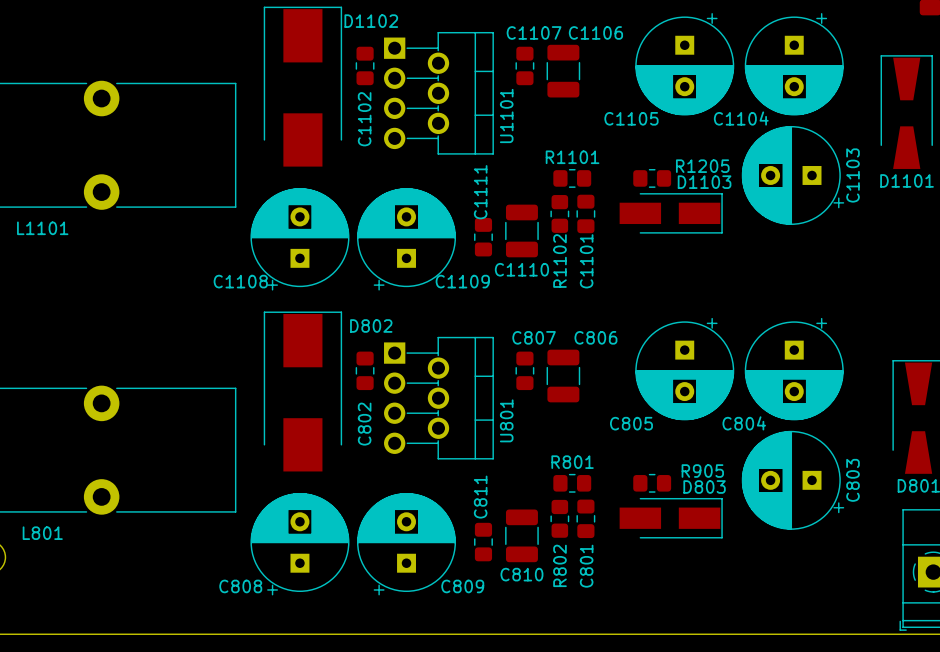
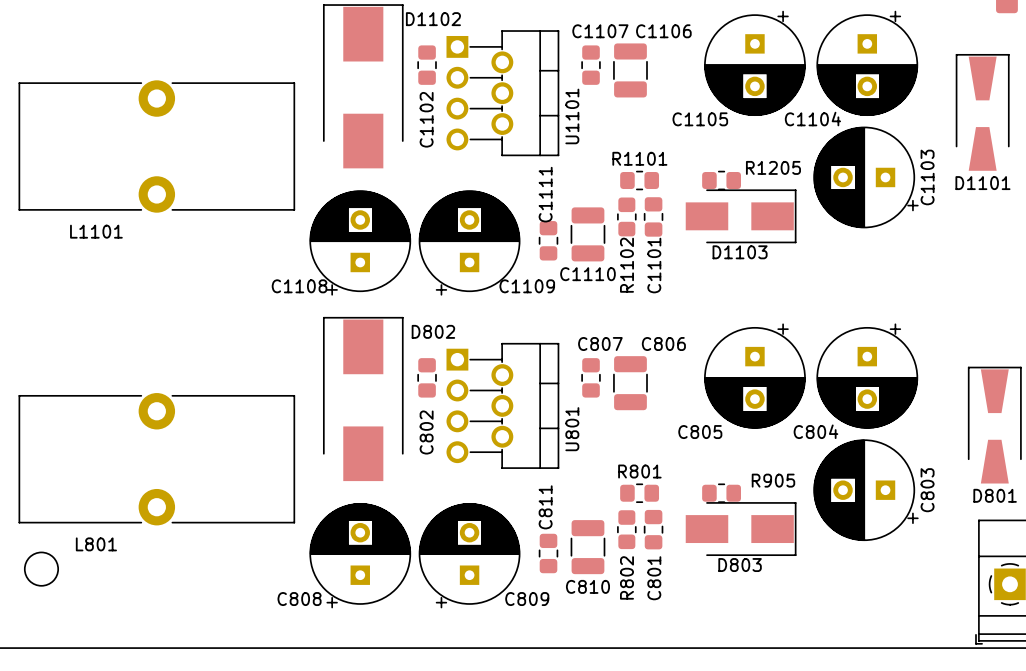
D1103 name position: D1103 (704, 182) -> D1103 (740, 252)
D1103 footprint: [619, 193, 723, 234] -> [685, 189, 797, 244]
D803 name position: D803 (704, 487) -> D803 (740, 565)
D803 footprint: [619, 497, 723, 539] -> [685, 502, 797, 556]

